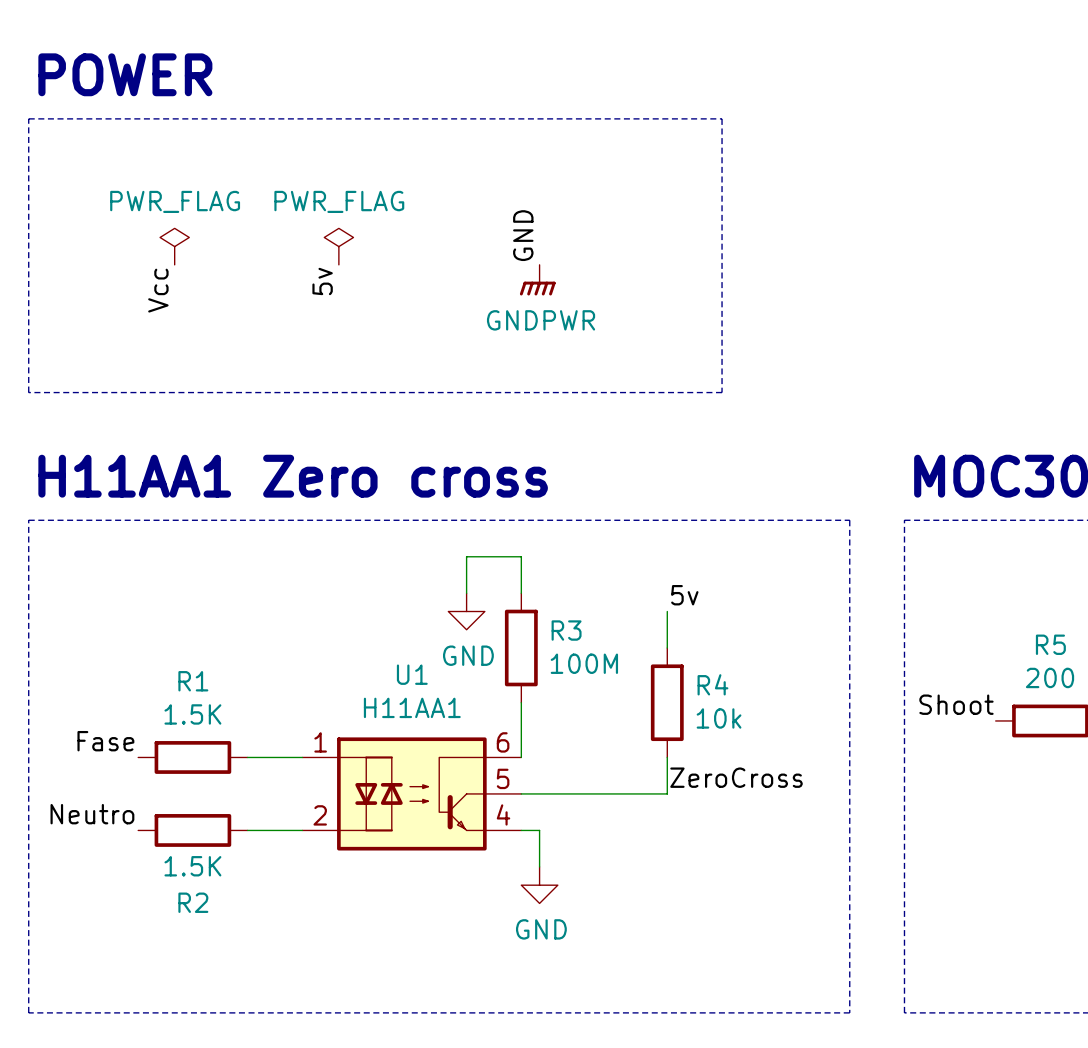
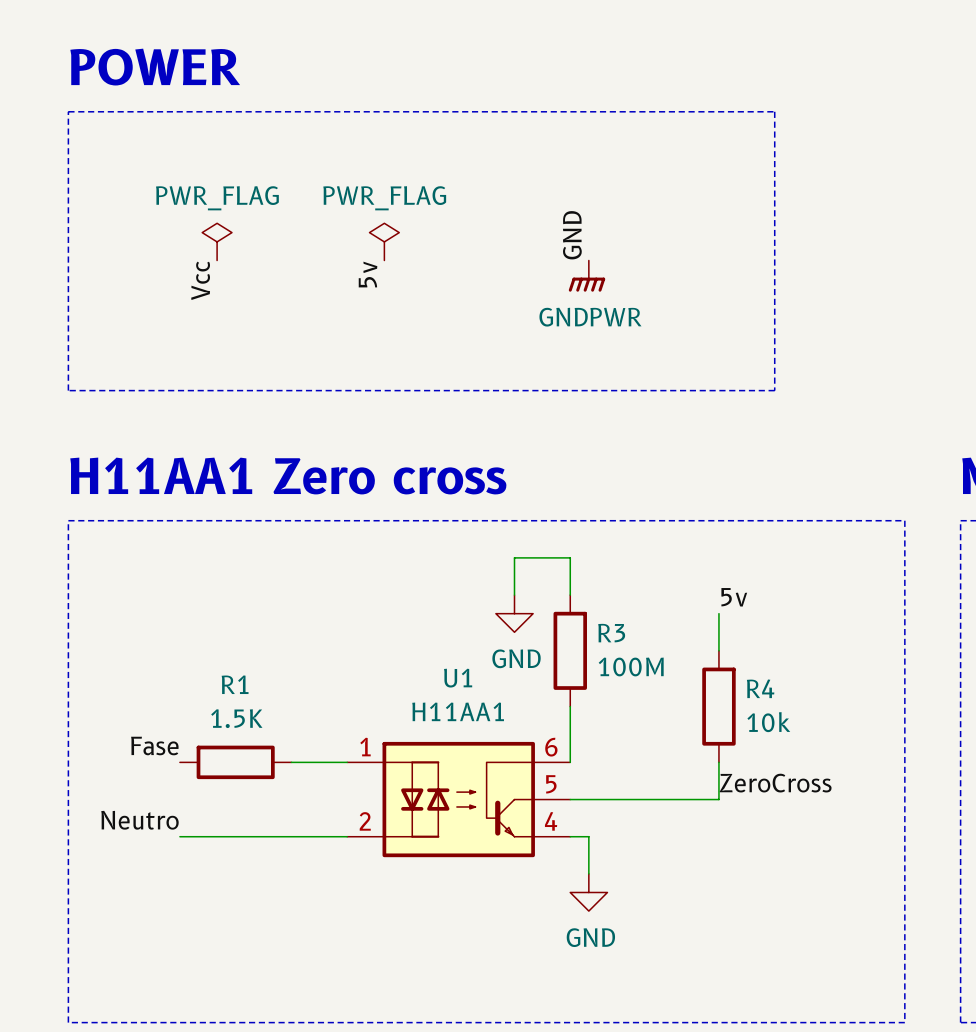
wire: none -> (179, 836) (291, 836)
R2: 1.5K (192, 830) -> none

